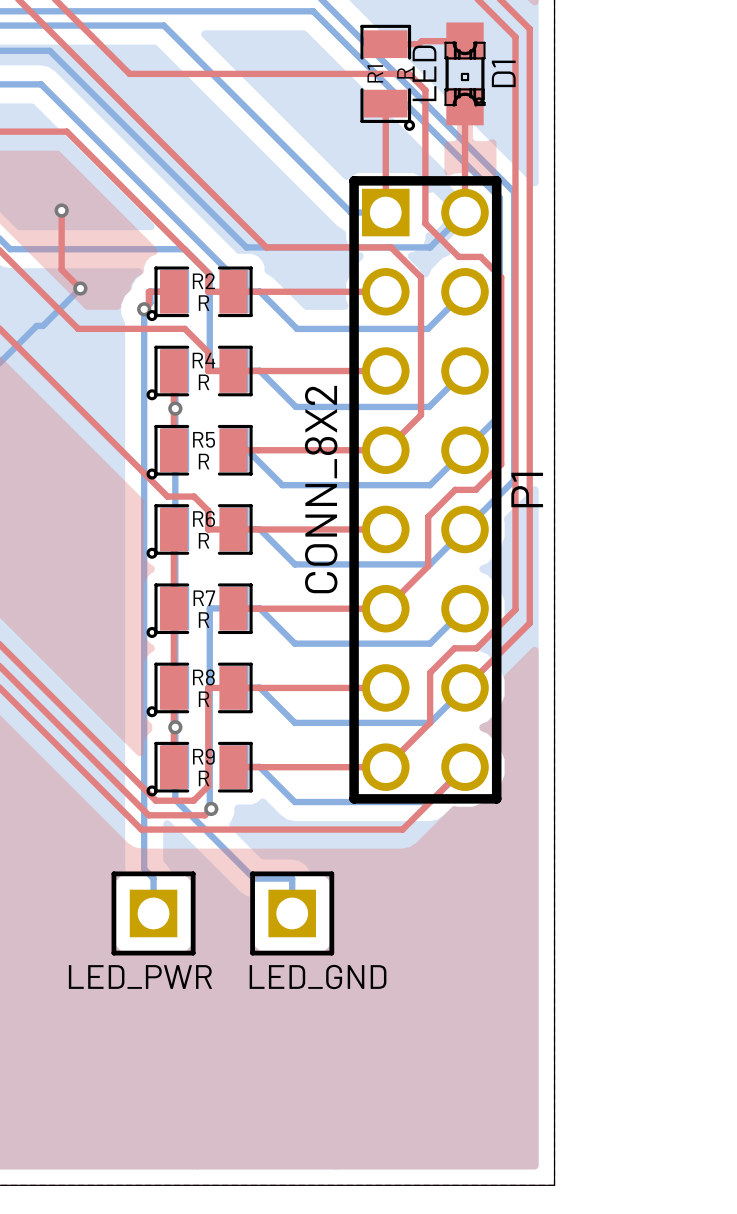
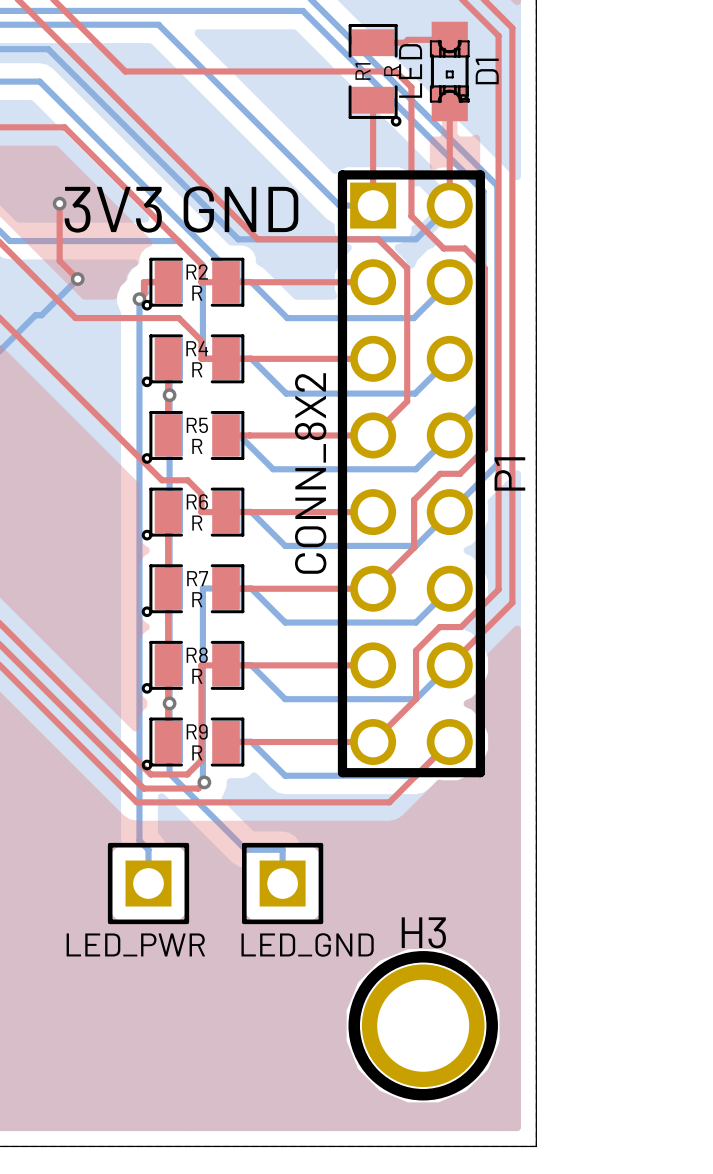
text: none -> 3V3 GND (181, 209)
H3: none -> (423, 1025)

